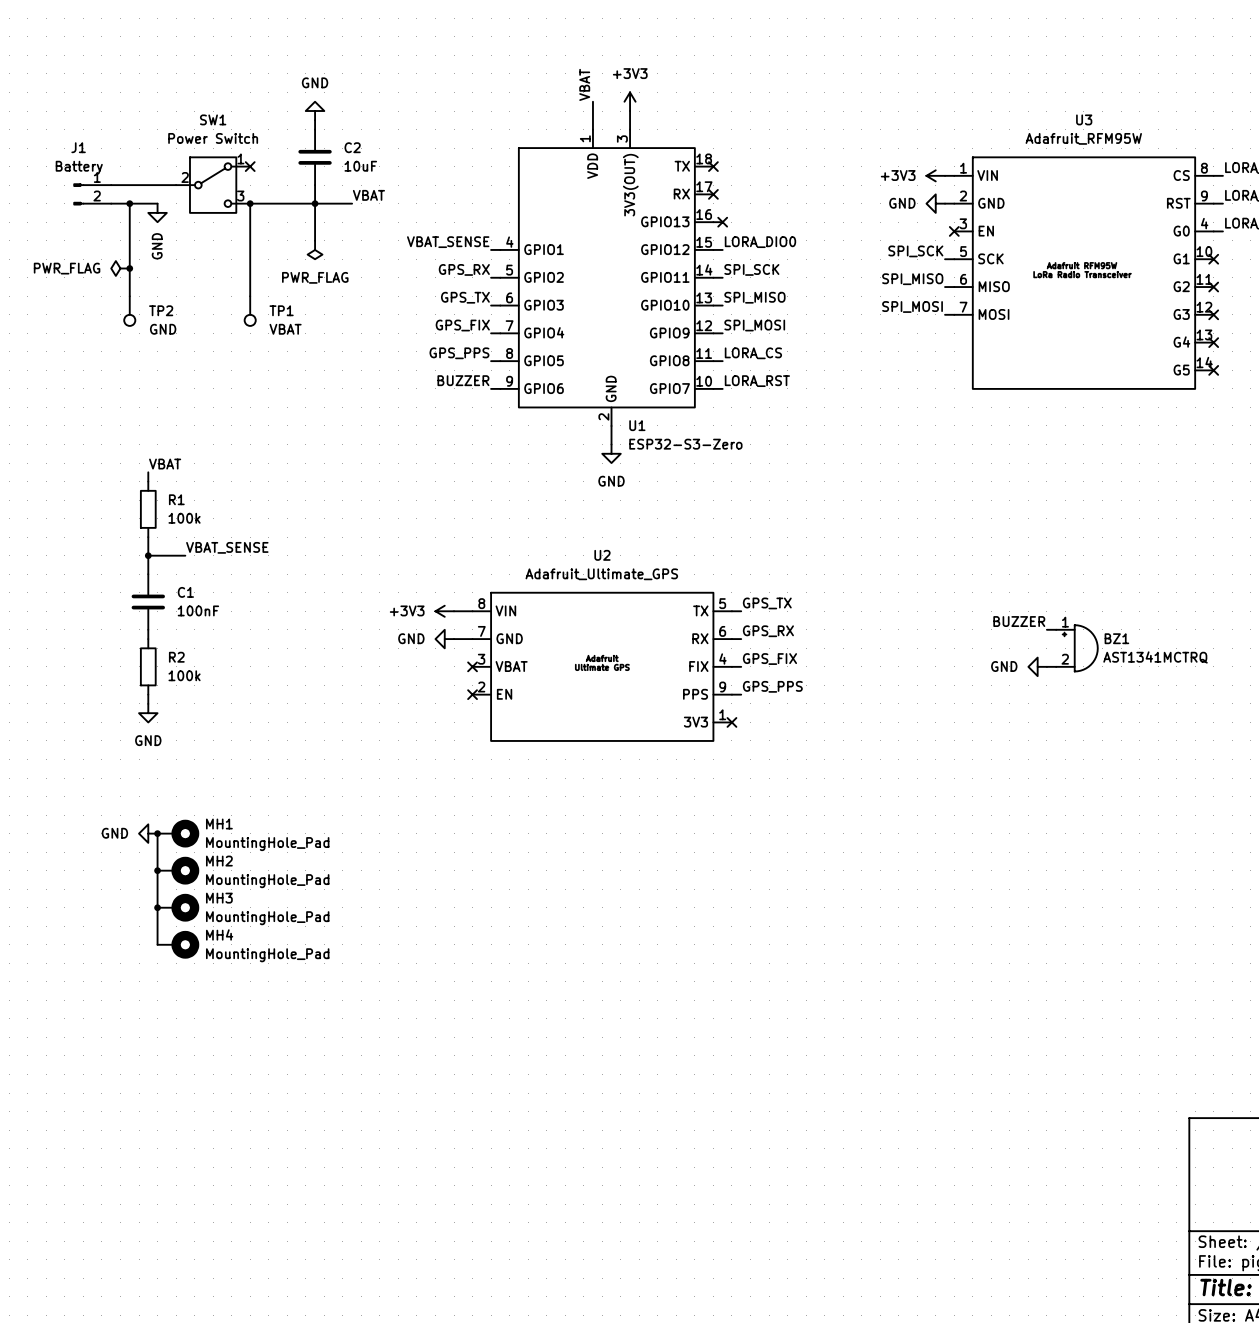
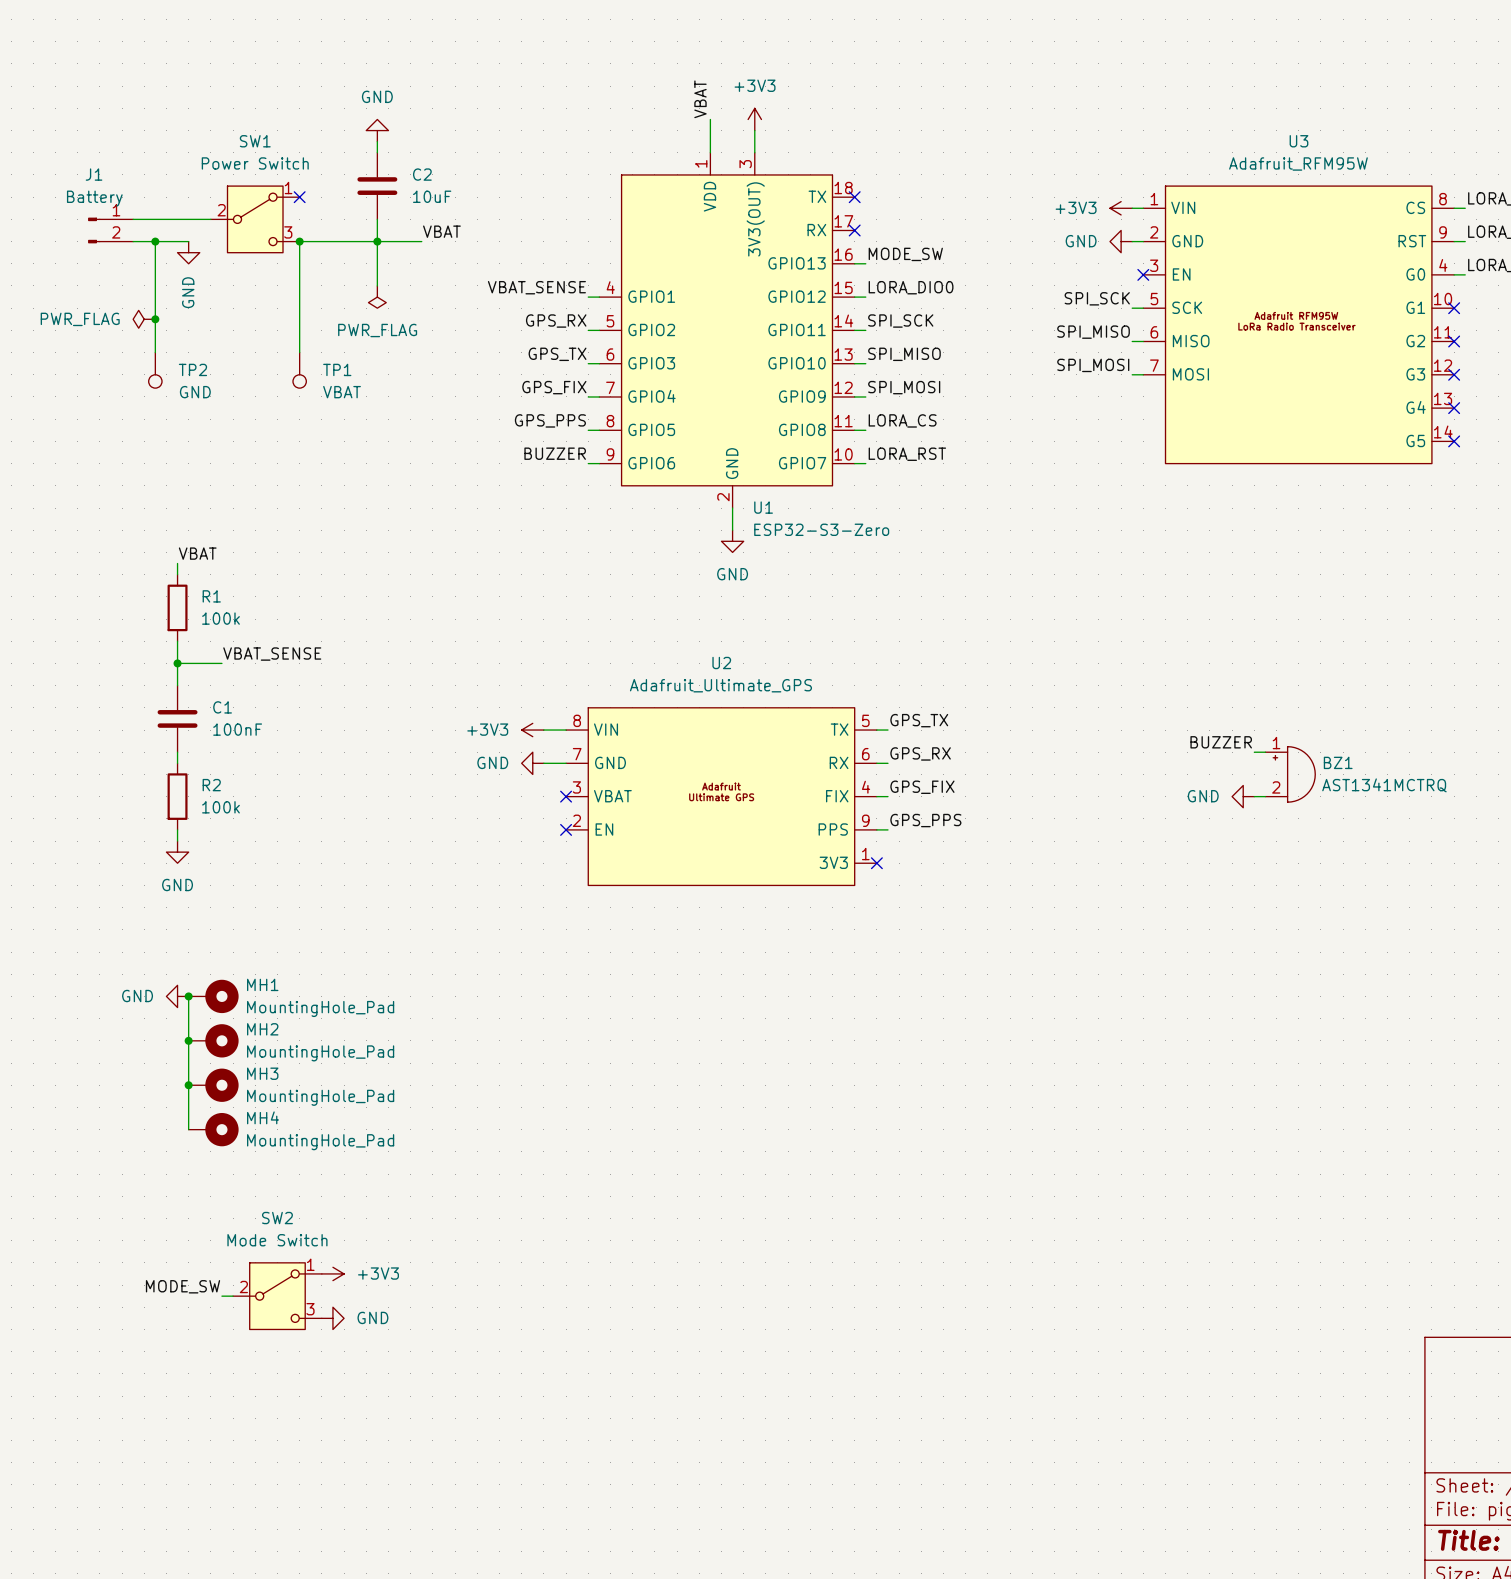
label: none -> MODE_SW (905, 254)
no-connect mark: (722, 222) -> none
power symbol: none -> +3V3 (332, 1273)
label: none -> MODE_SW (183, 1286)
wire: none -> (221, 1296) (233, 1296)
SW2: none -> Mode Switch (277, 1296)
power symbol: none -> GND (332, 1318)

